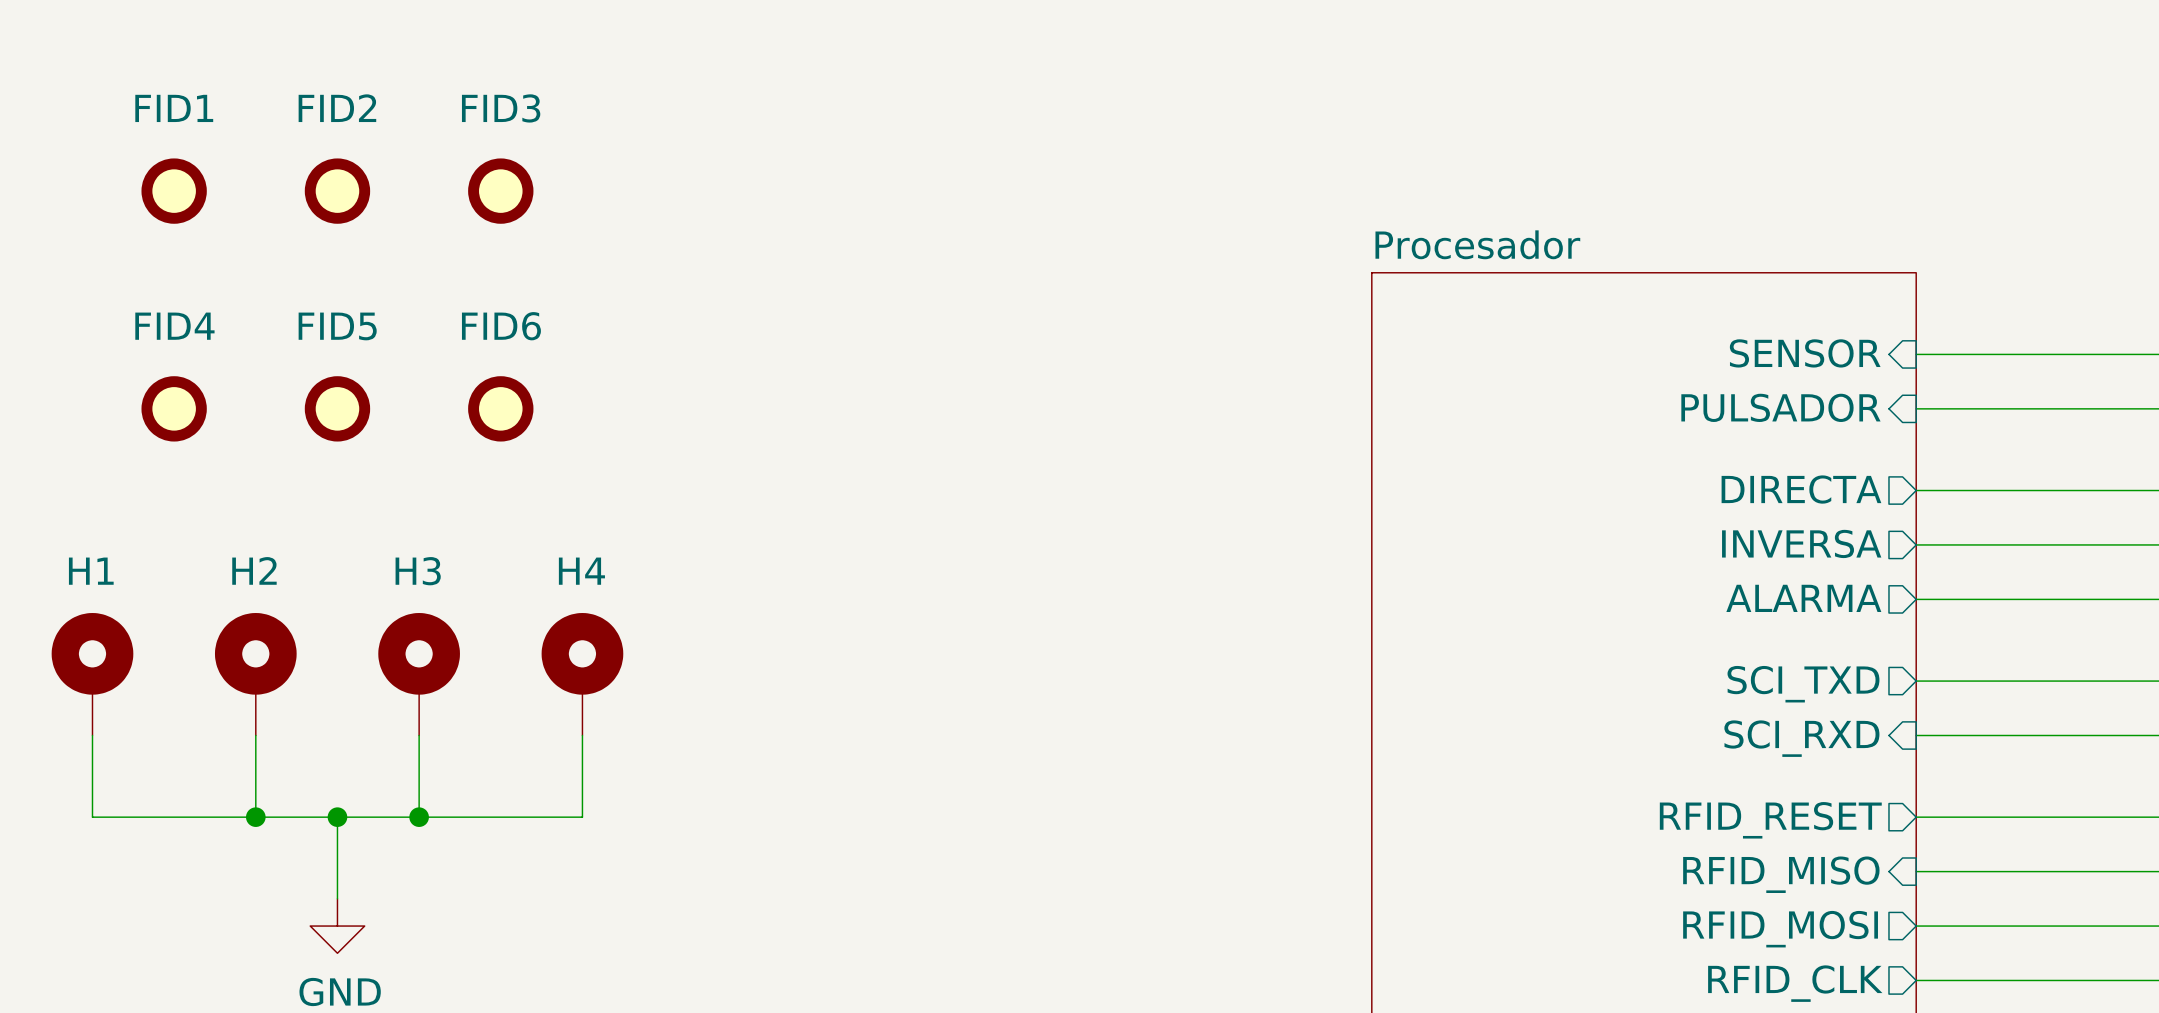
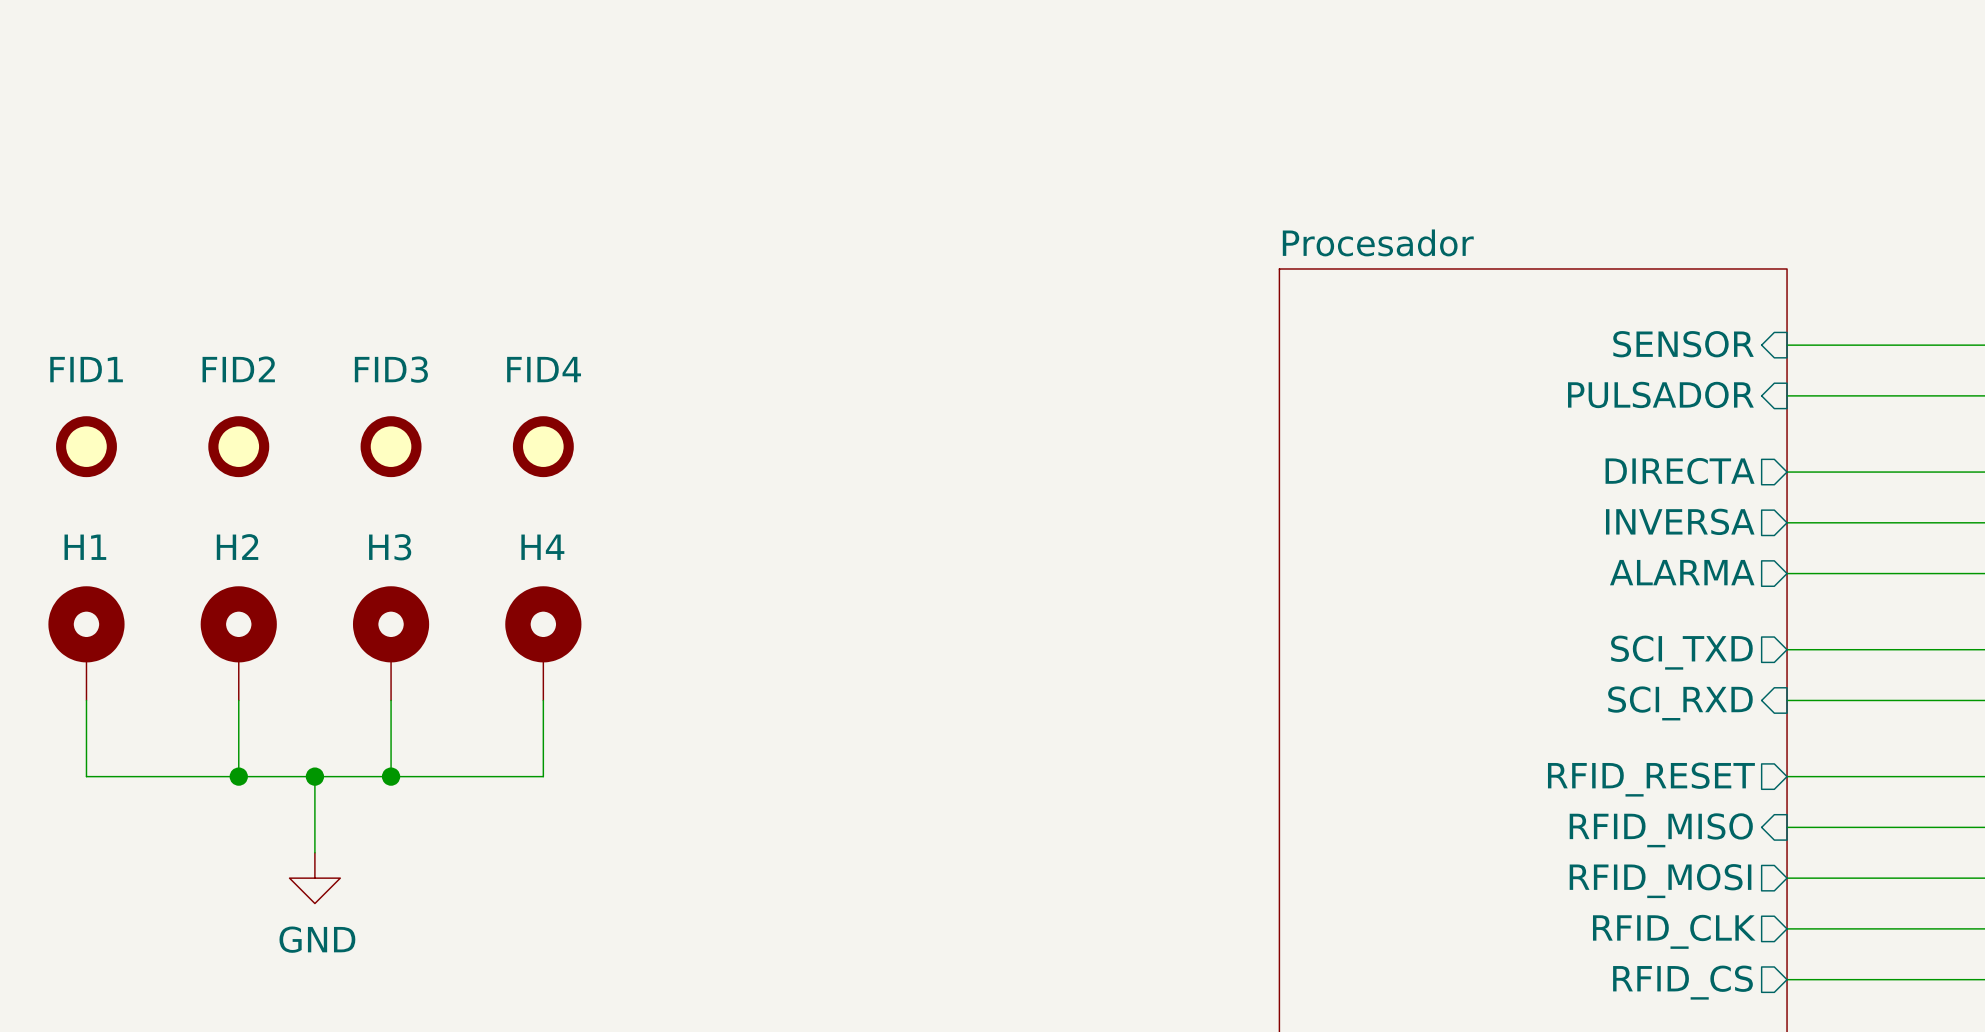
FID1 position: (174, 191) -> (86, 446)
FID2 position: (337, 191) -> (238, 446)
FID3 position: (500, 191) -> (391, 446)
FID4 position: (174, 408) -> (543, 446)
FID5: (337, 408) -> none
FID6: (500, 408) -> none

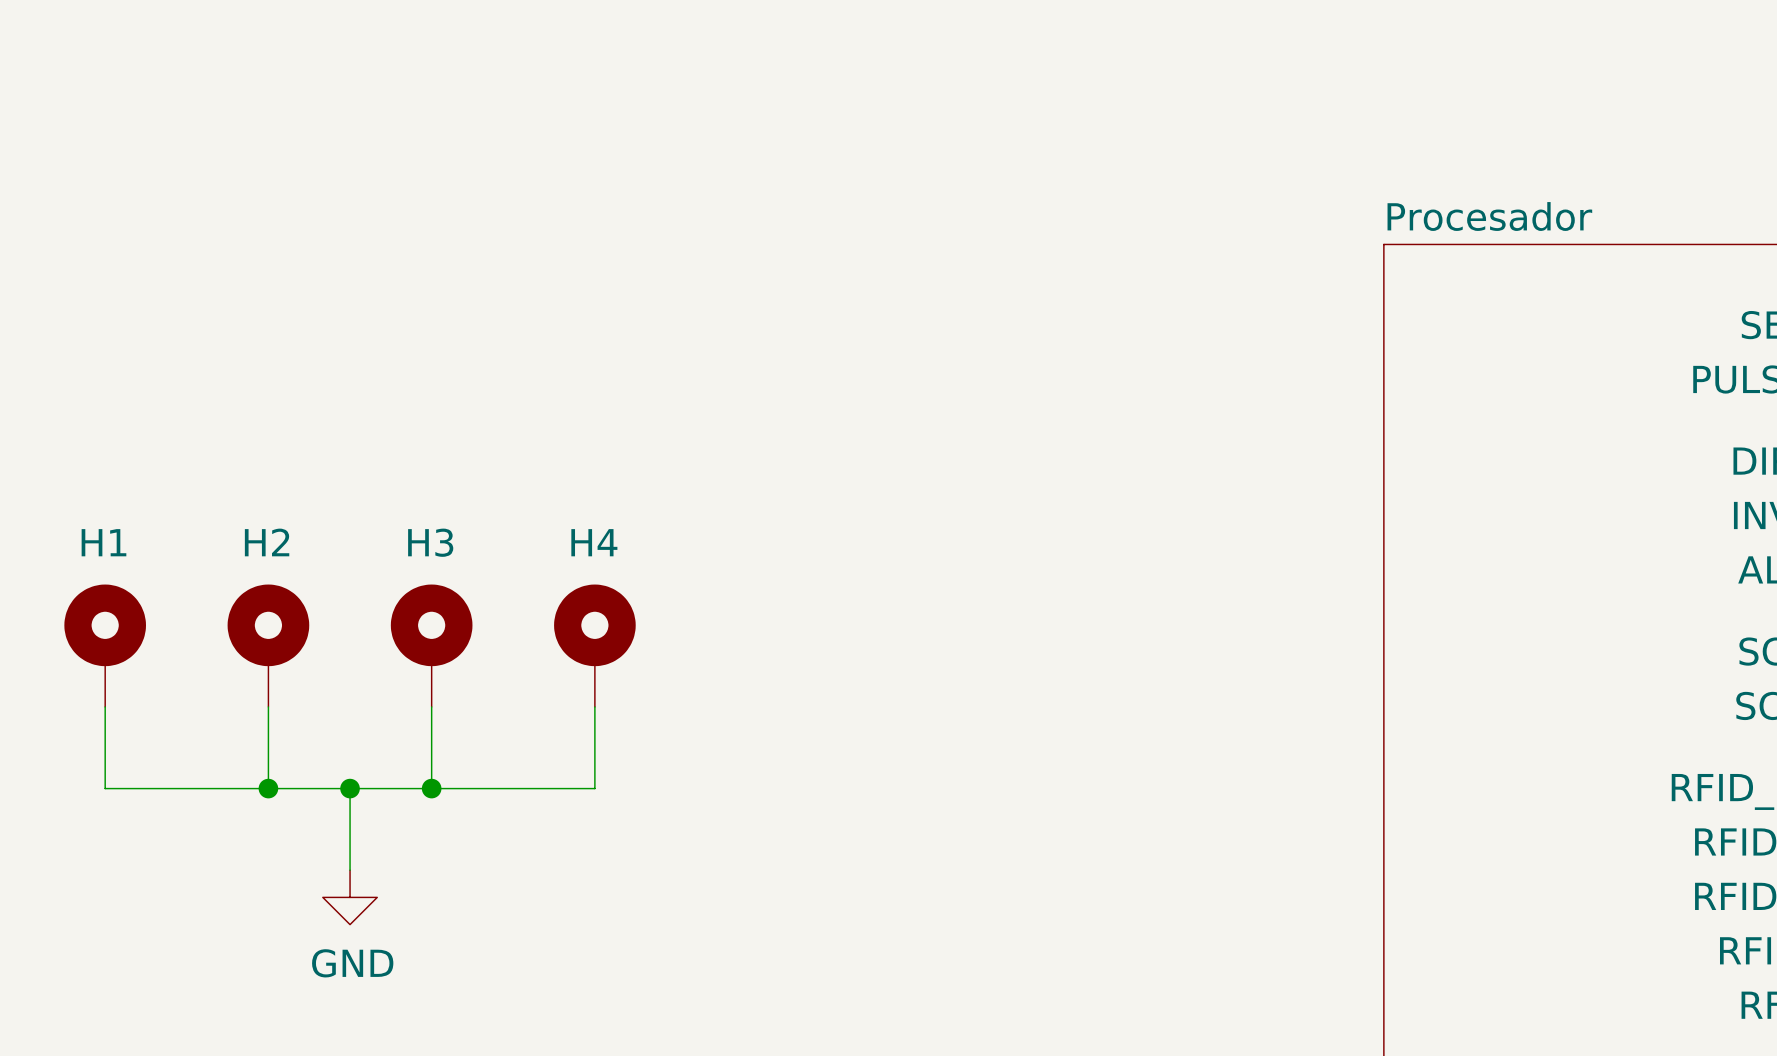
FID1: (86, 446) -> none
FID2: (238, 446) -> none
FID3: (391, 446) -> none
FID4: (543, 446) -> none

